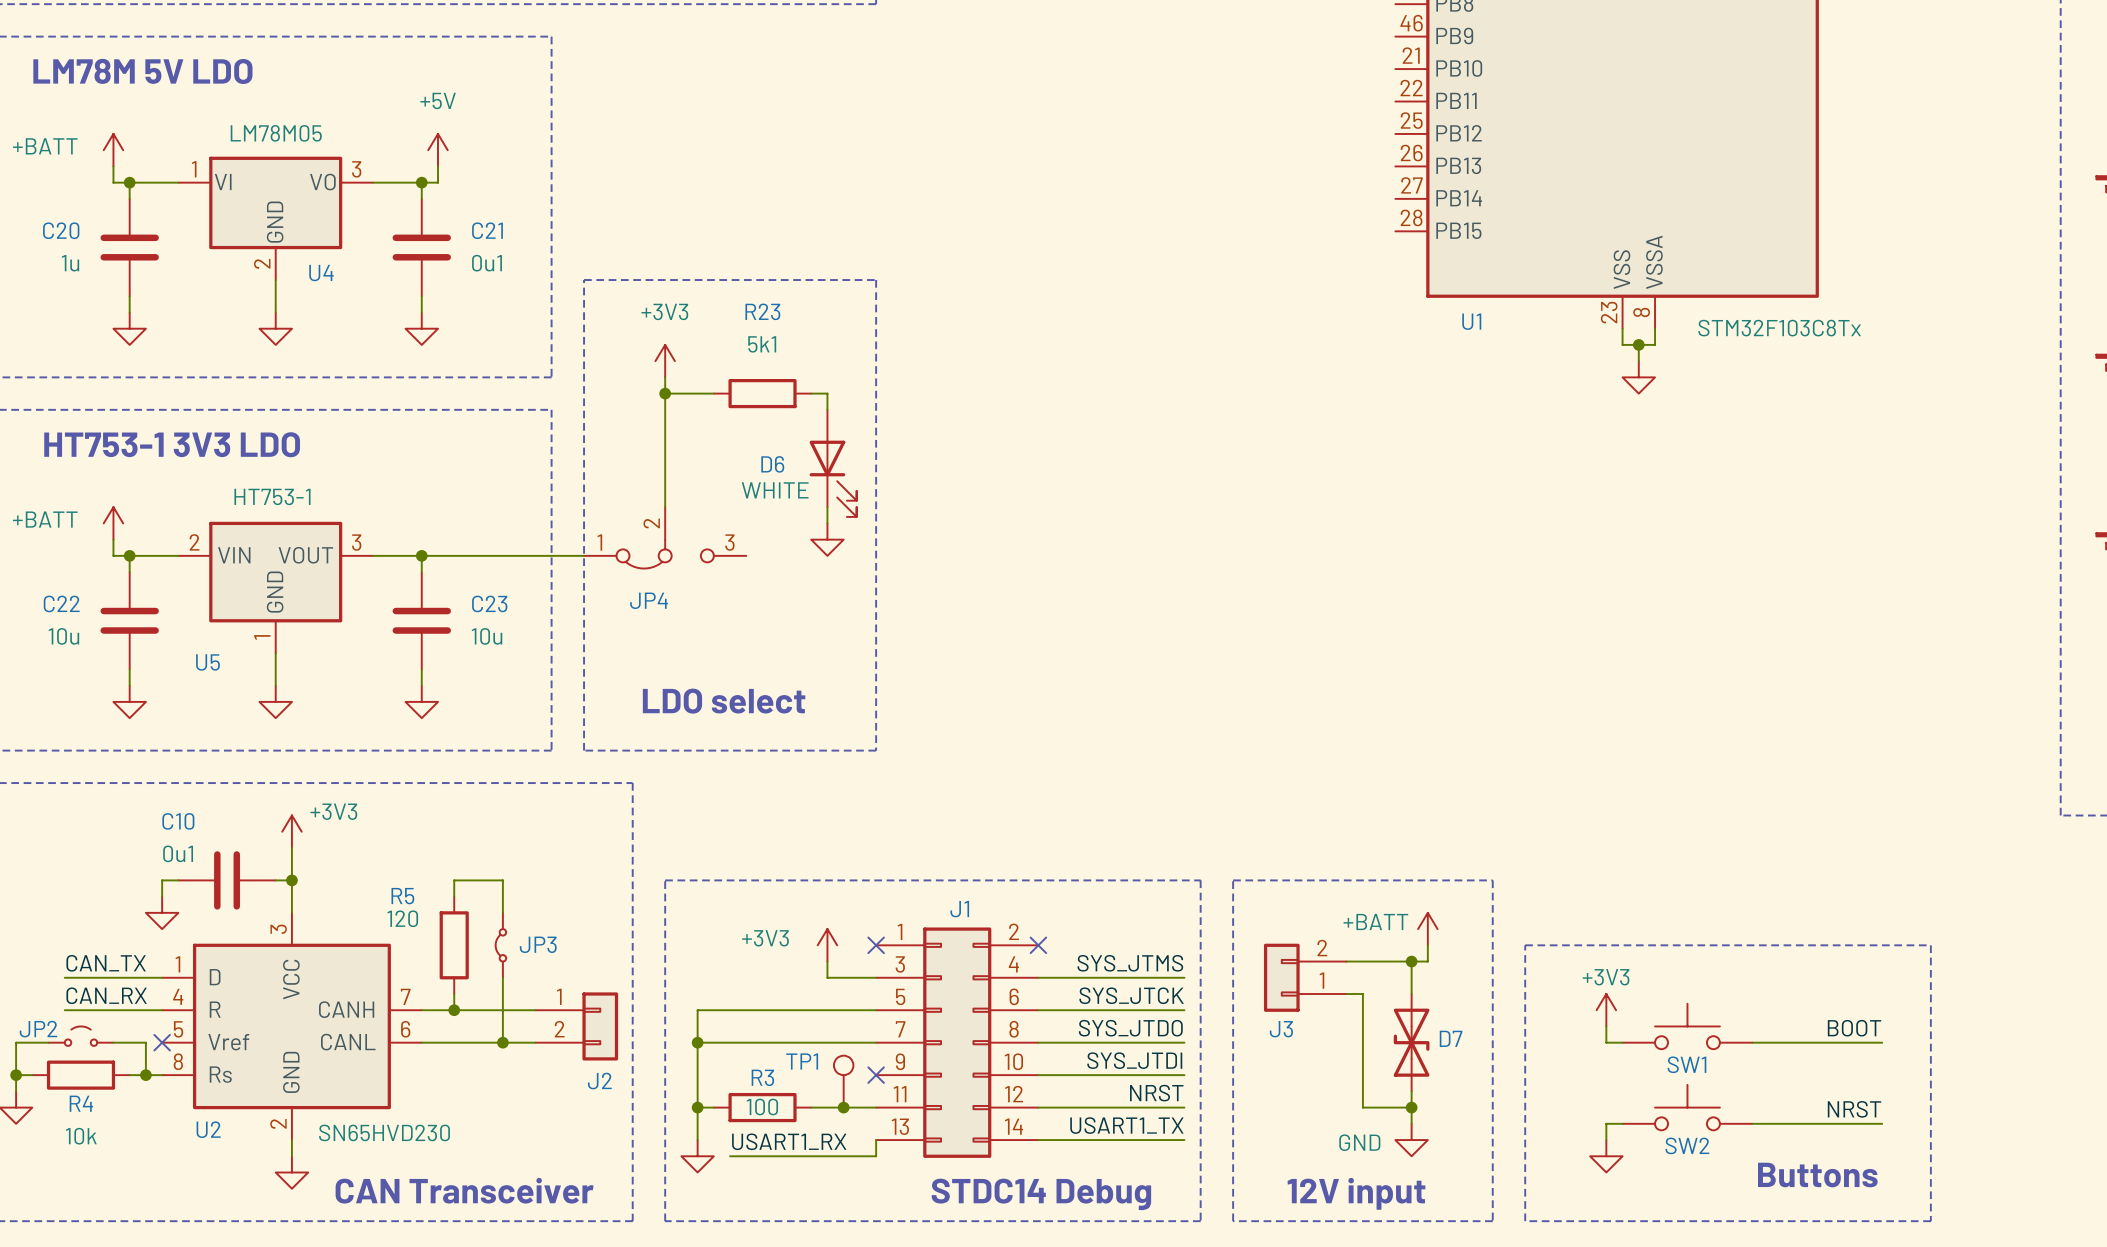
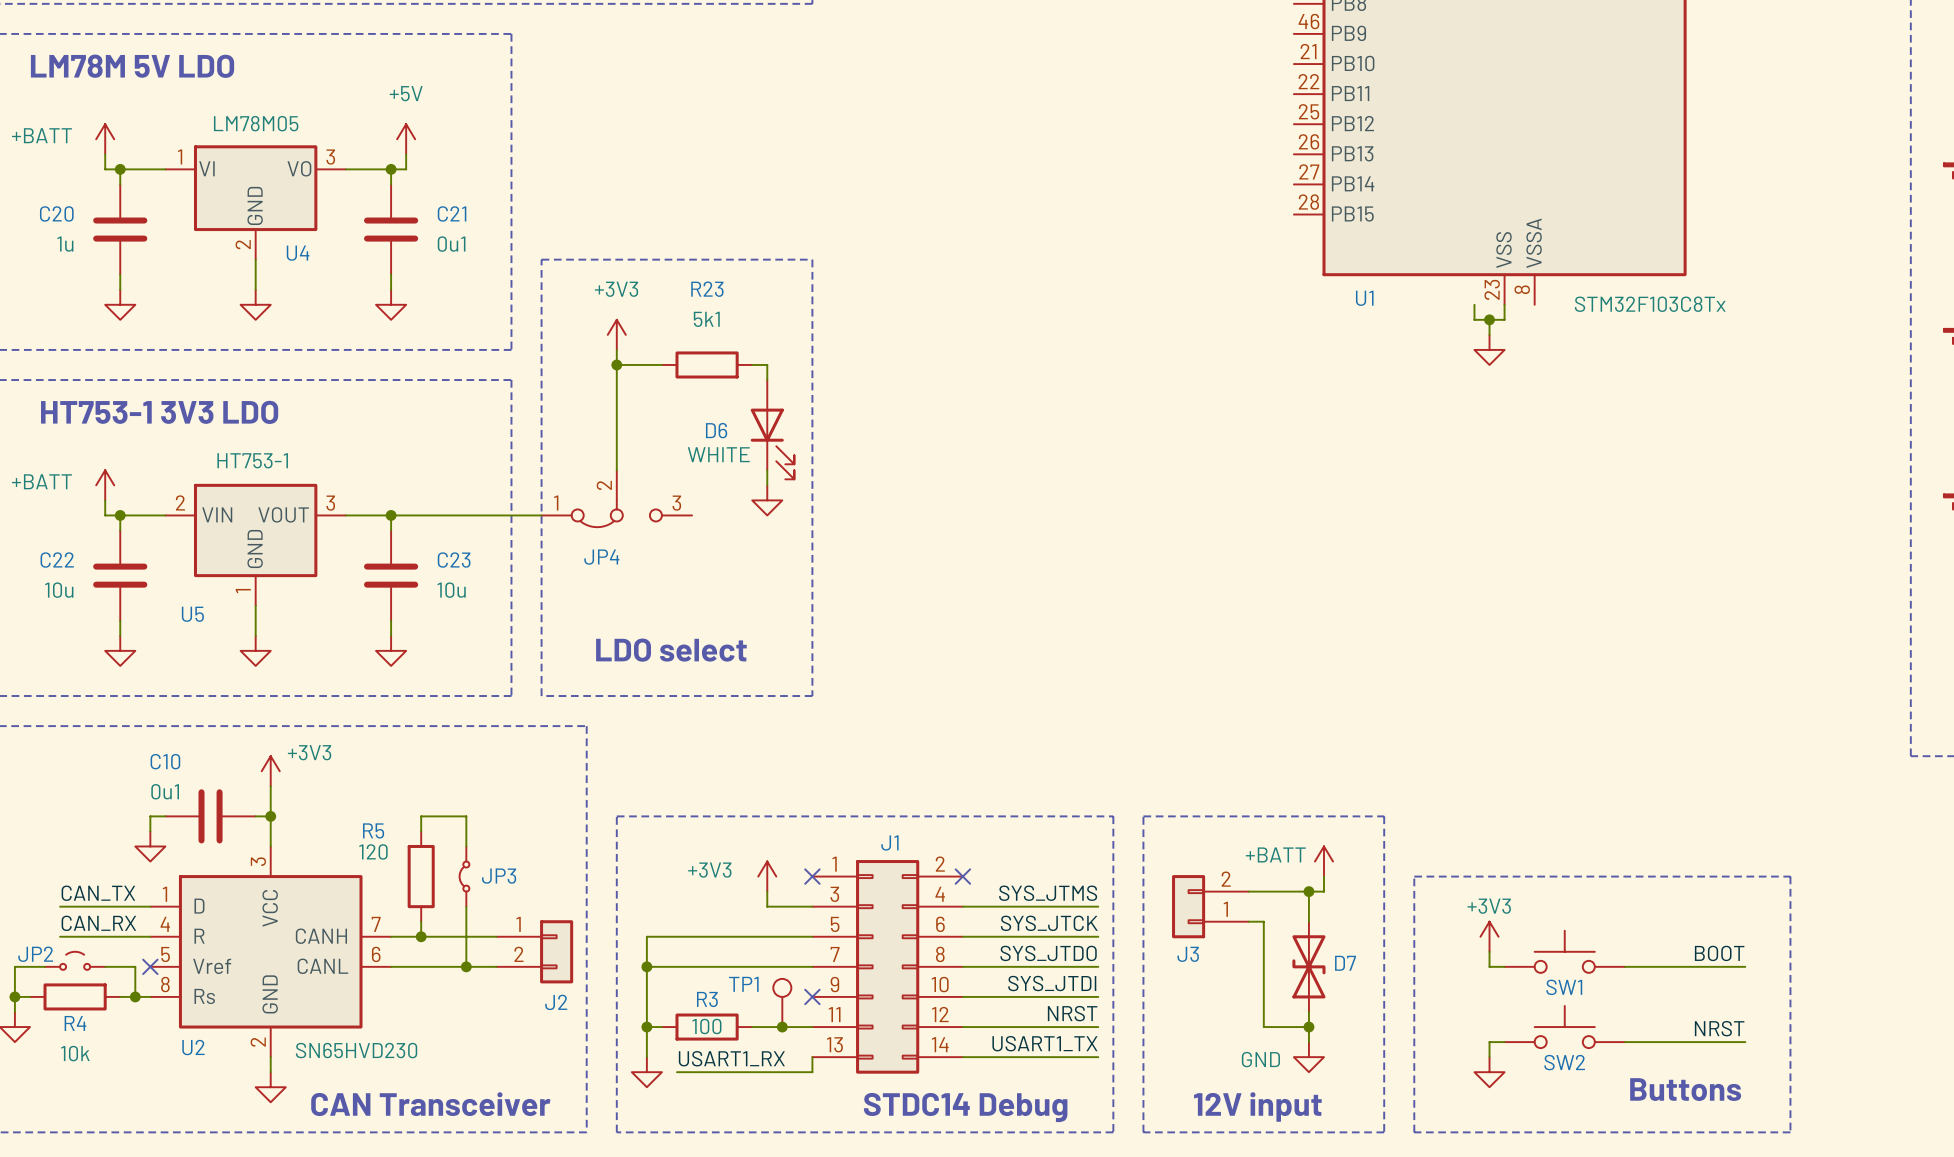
wire: (1655, 328) (1655, 344) (1622, 344) -> (1474, 304) (1474, 319) (1504, 319)
wire: (1638, 344) (1638, 361) -> (1489, 319) (1489, 334)
junction position: (1638, 344) -> (1489, 319)
power symbol position: (1638, 377) -> (1489, 349)

